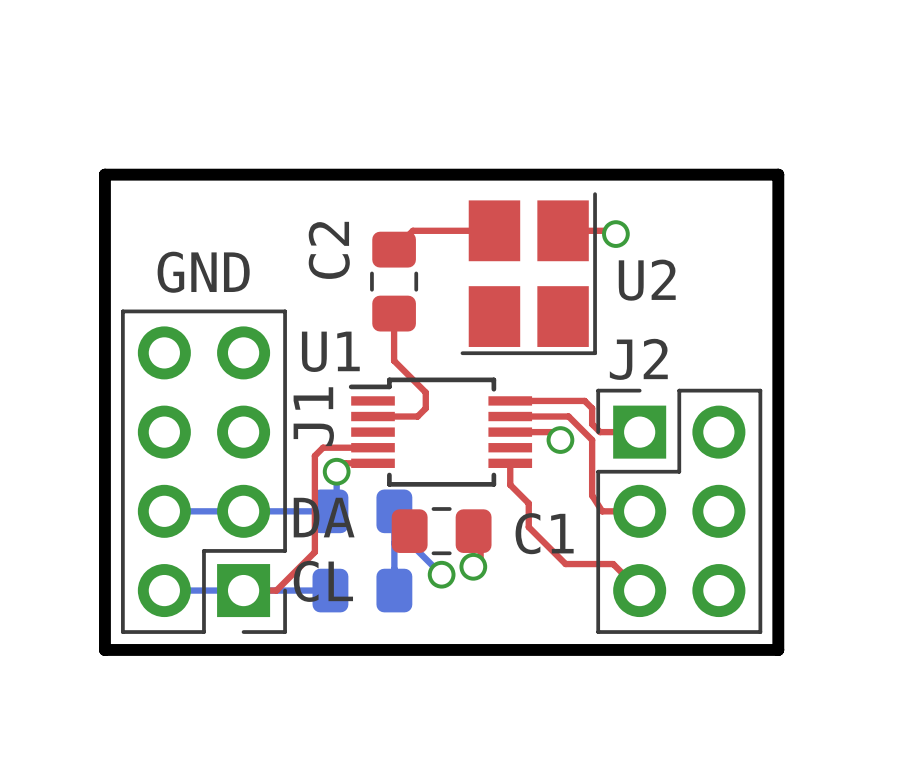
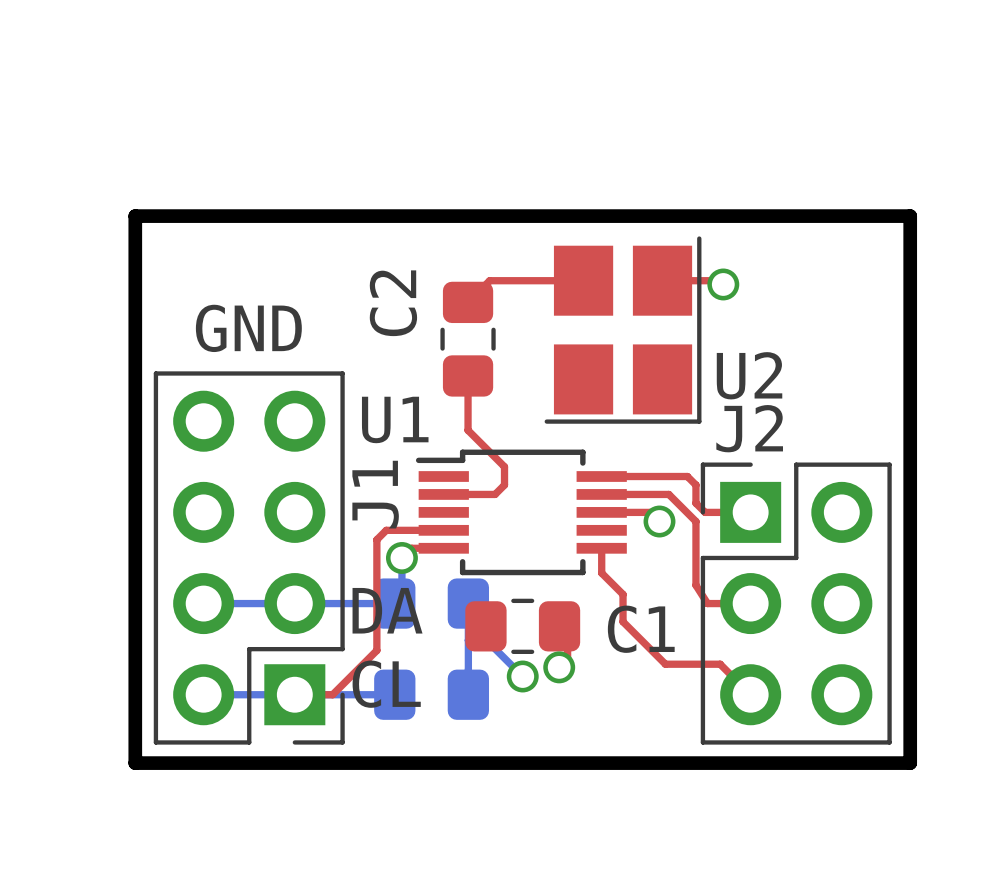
U2 name position: U2 (647, 280) -> U2 (749, 375)

